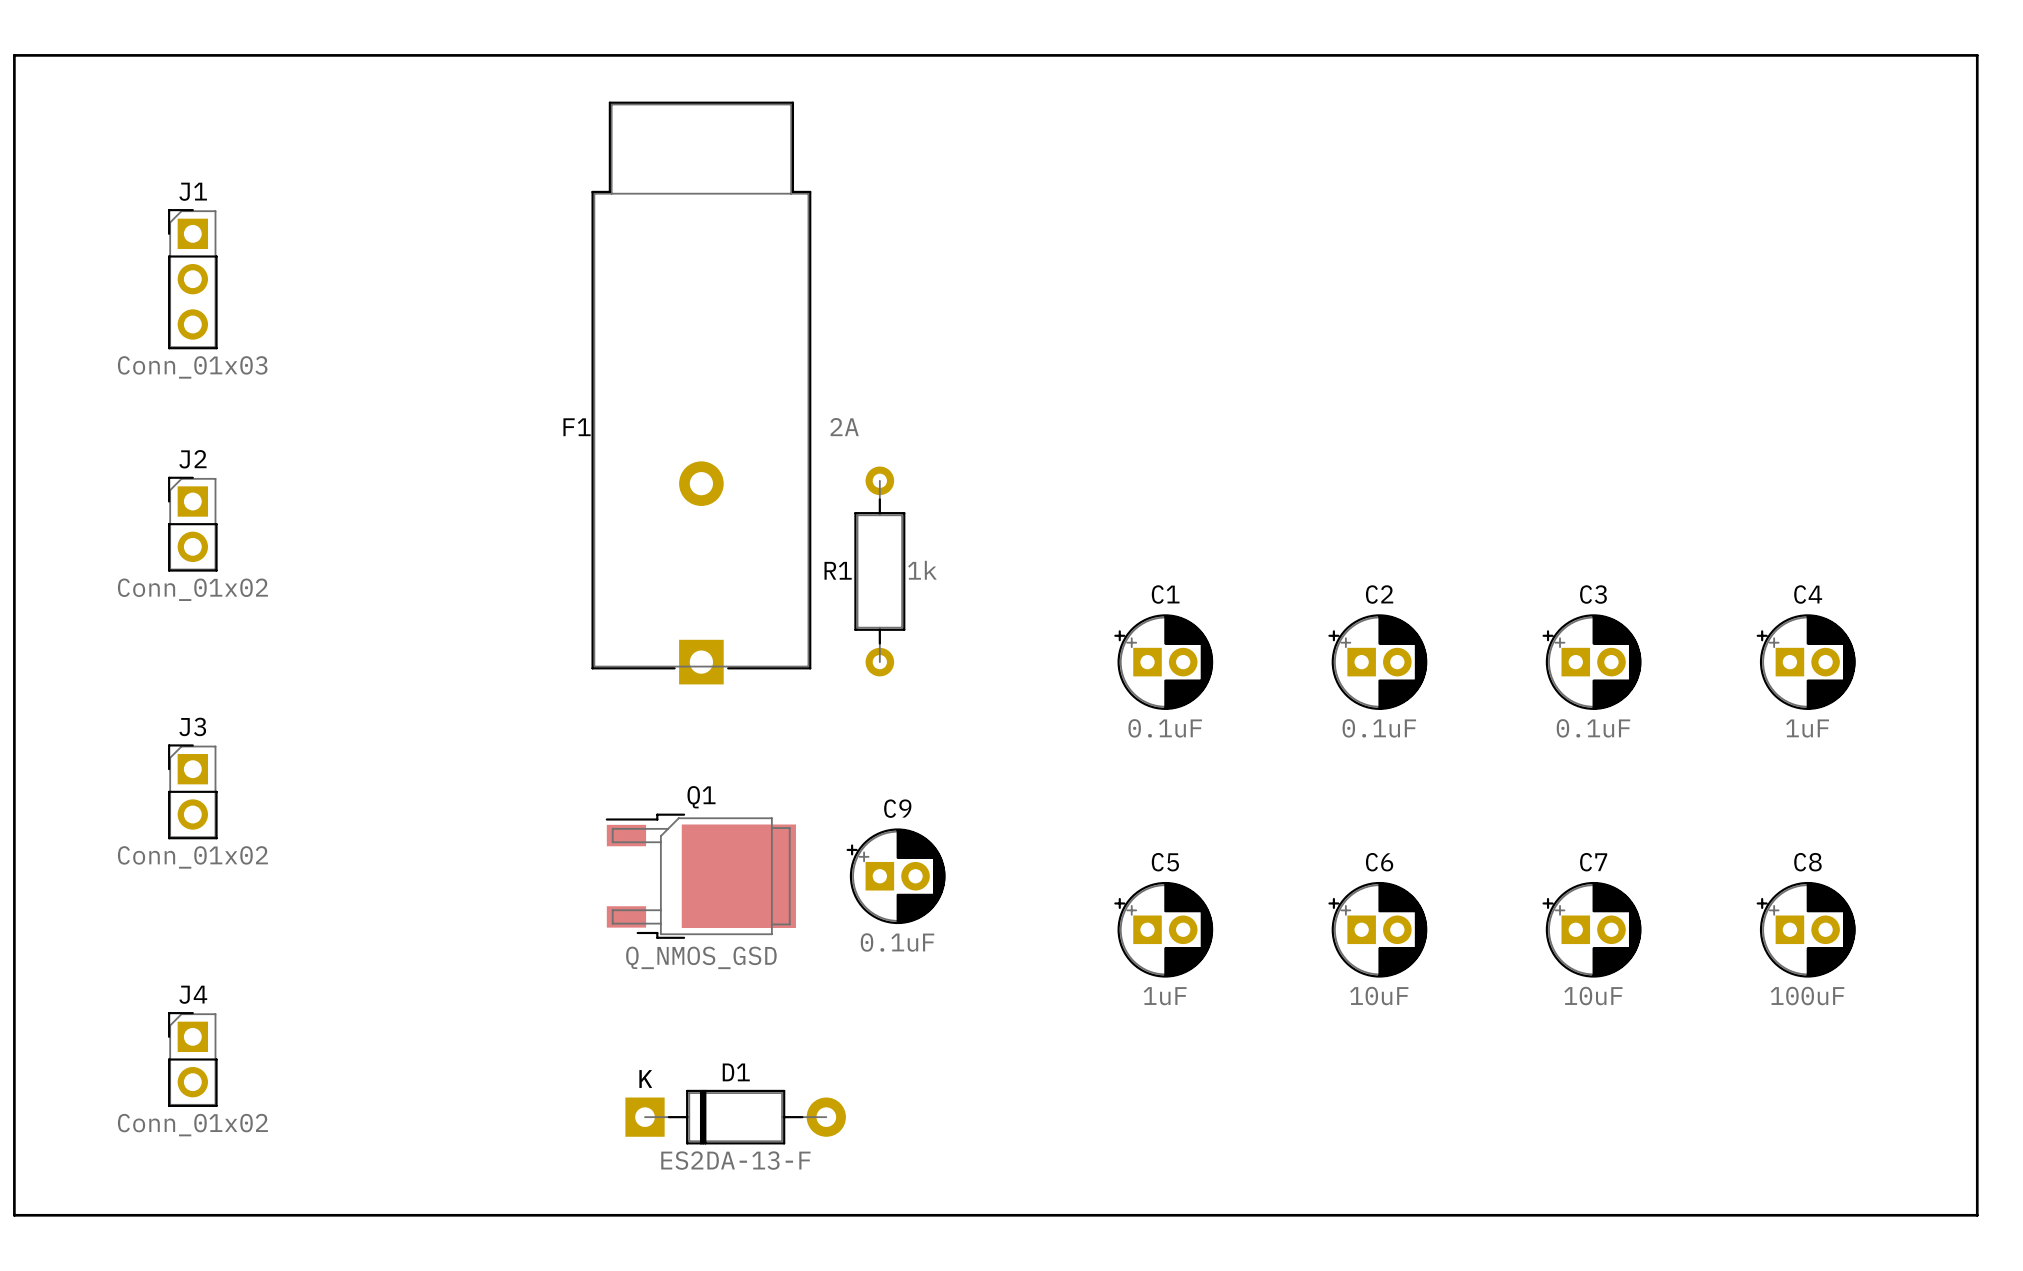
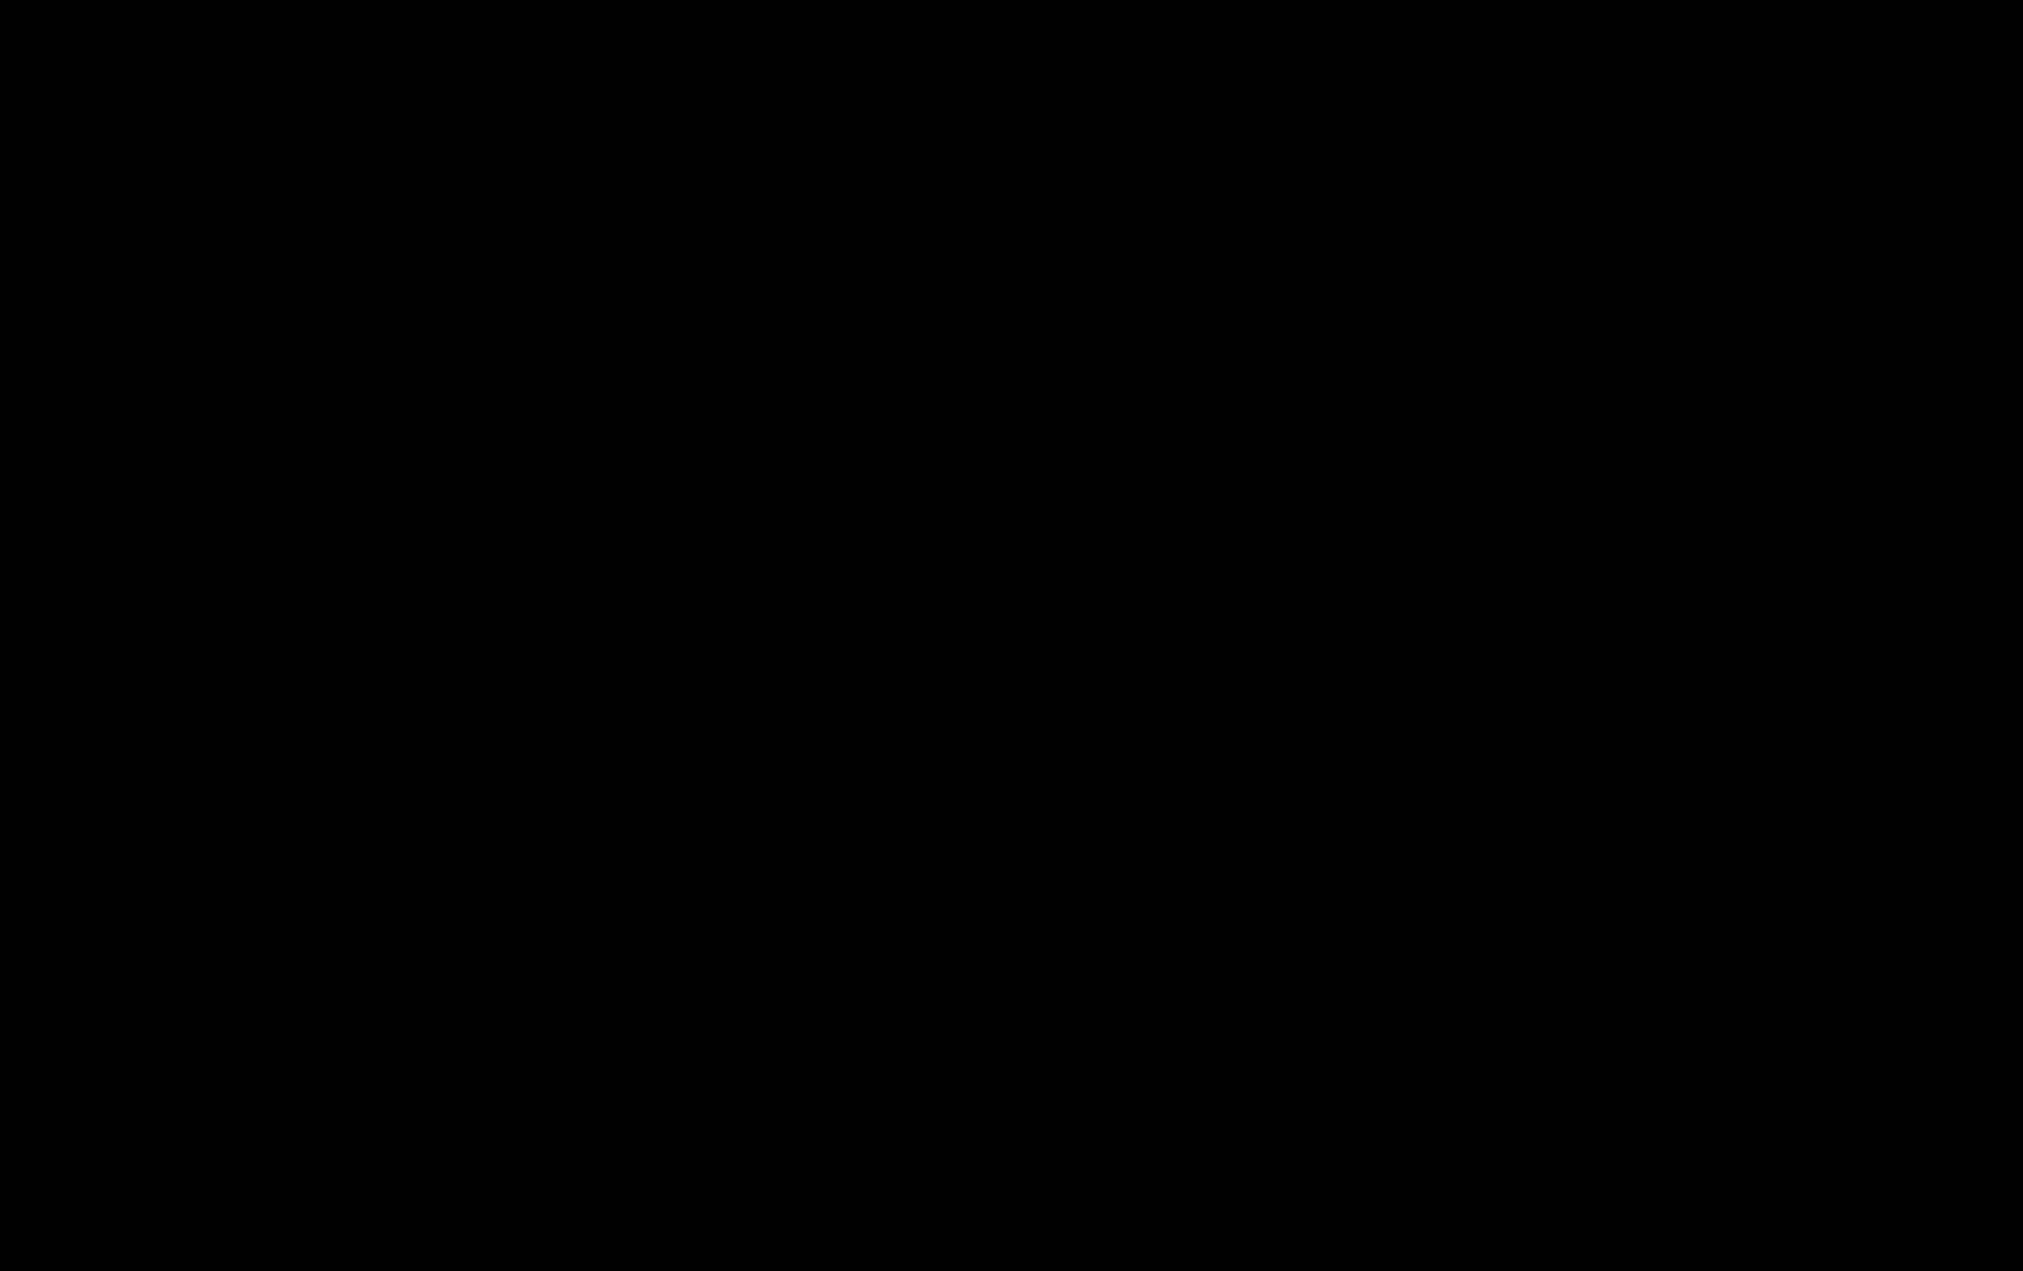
board edge: (14, 55) (1977, 55) (1977, 1215) (14, 1215) (14, 55) -> none
J1: Conn_01x03 (192, 279) -> none
F1: 2A (701, 393) -> none
J2: Conn_01x02 (192, 524) -> none
R1: 1k (879, 571) -> none
C1: 0.1uF (1163, 662) -> none
C2: 0.1uF (1377, 662) -> none
C3: 0.1uF (1591, 662) -> none
C4: 1uF (1806, 662) -> none
J3: Conn_01x02 (192, 791) -> none
Q1: Q_NMOS_GSD (700, 876) -> none
C9: 0.1uF (896, 876) -> none
C5: 1uF (1163, 929) -> none
C6: 10uF (1377, 929) -> none
C7: 10uF (1591, 929) -> none
C8: 100uF (1806, 929) -> none
J4: Conn_01x02 (192, 1059) -> none
D1: ES2DA-13-F (735, 1117) -> none

